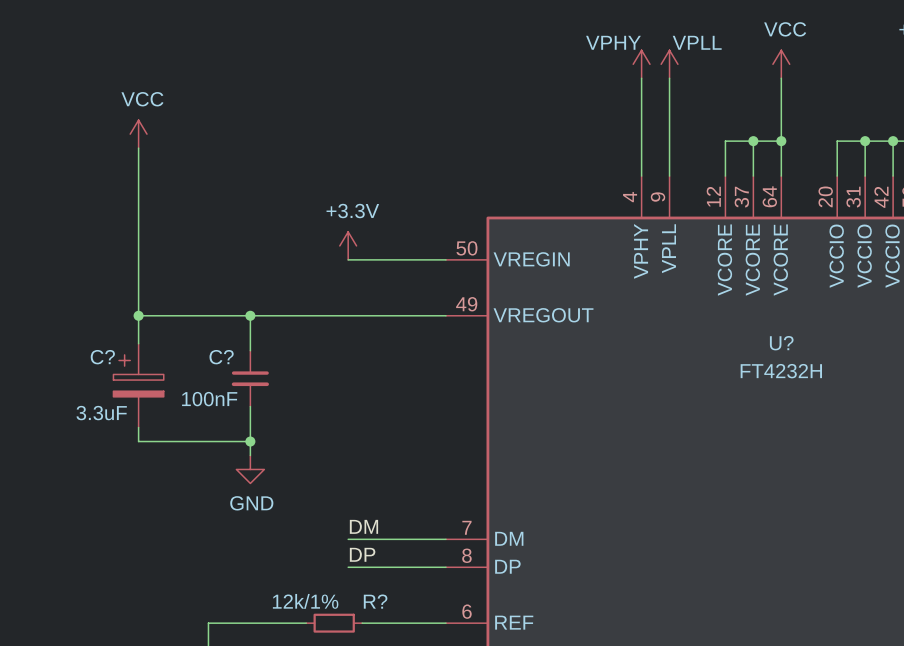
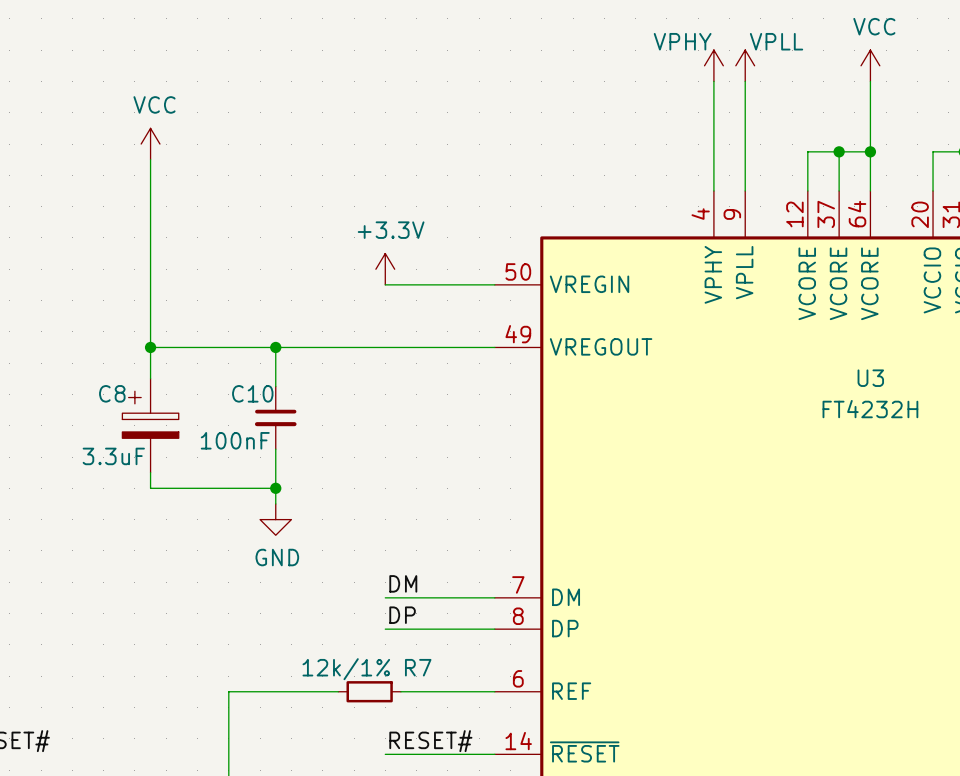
U? name: U? (781, 343) -> U3 (870, 378)
C? name: C? (102, 357) -> C8 (112, 393)
C? name: C? (221, 357) -> C10 (252, 393)
R? name: R? (375, 601) -> R7 (418, 667)

